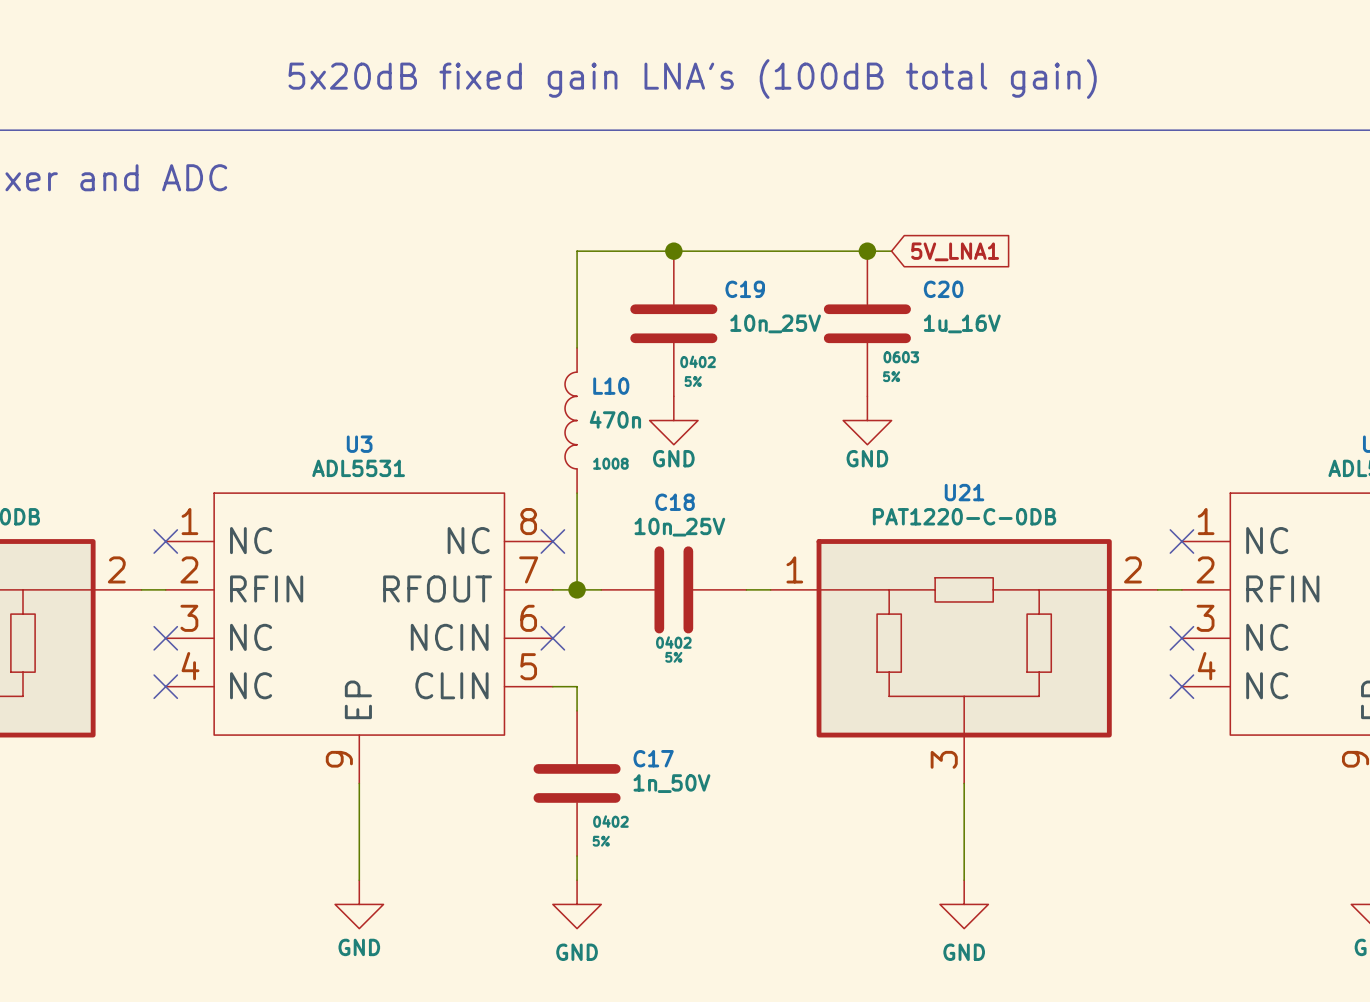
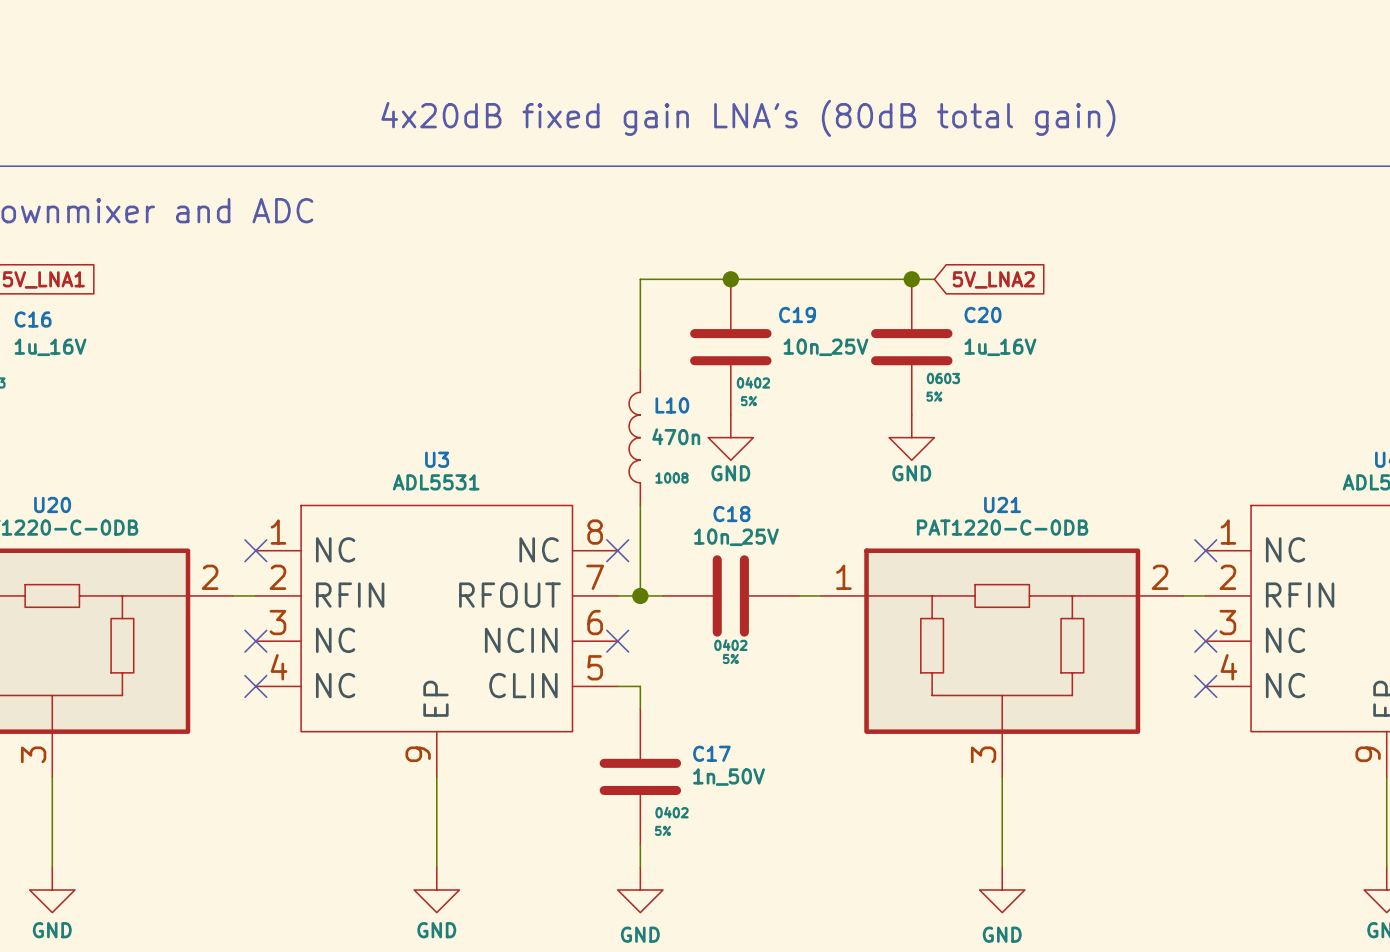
text: 5x20dB fixed gain LNA's (100dB total gain) (692, 79) -> 4x20dB fixed gain LNA's (80dB total gain) (748, 118)
global label: 5V_LNA1 (955, 251) -> 5V_LNA2 (993, 279)

